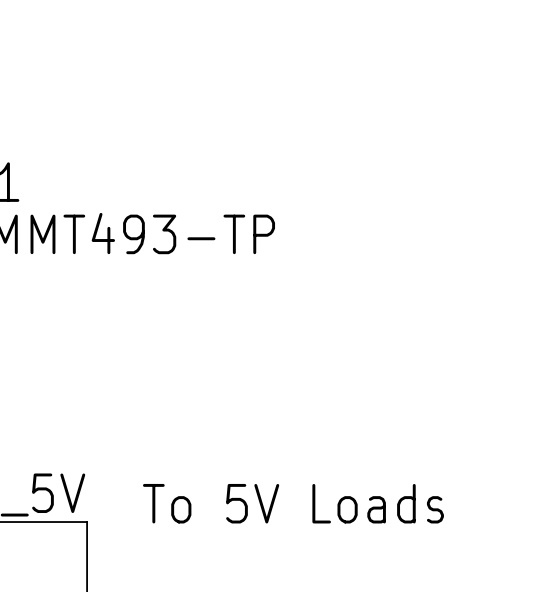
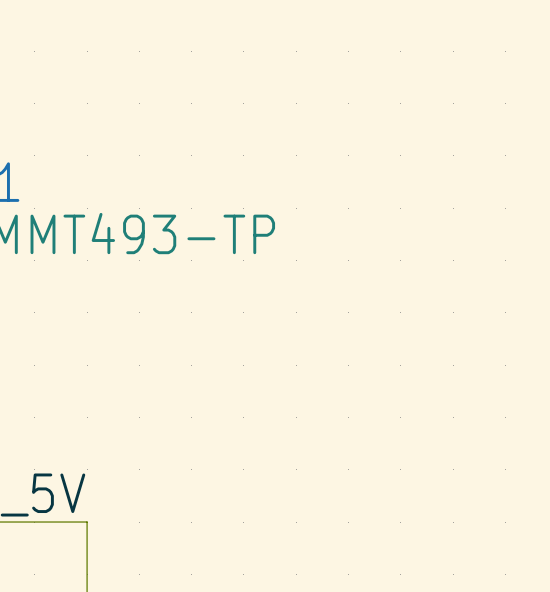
text: To 5V Loads (293, 503) -> none

